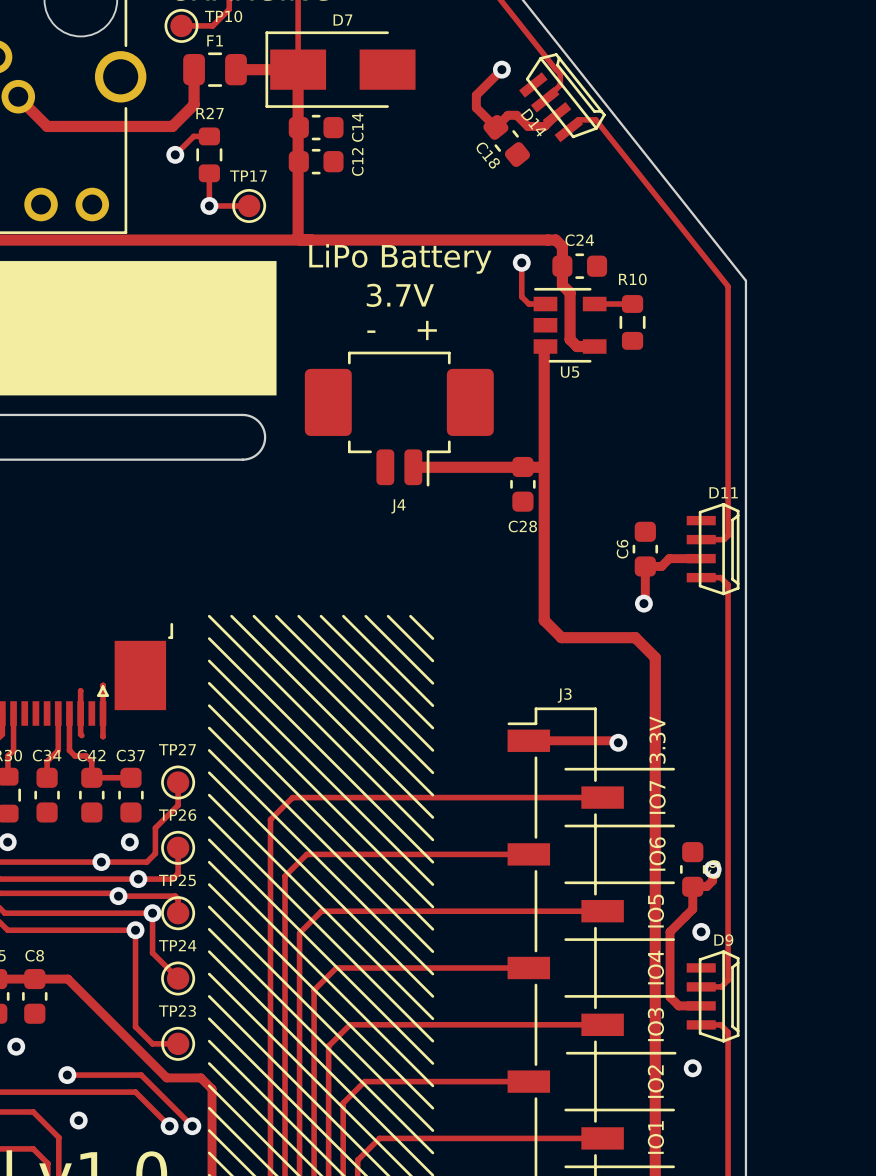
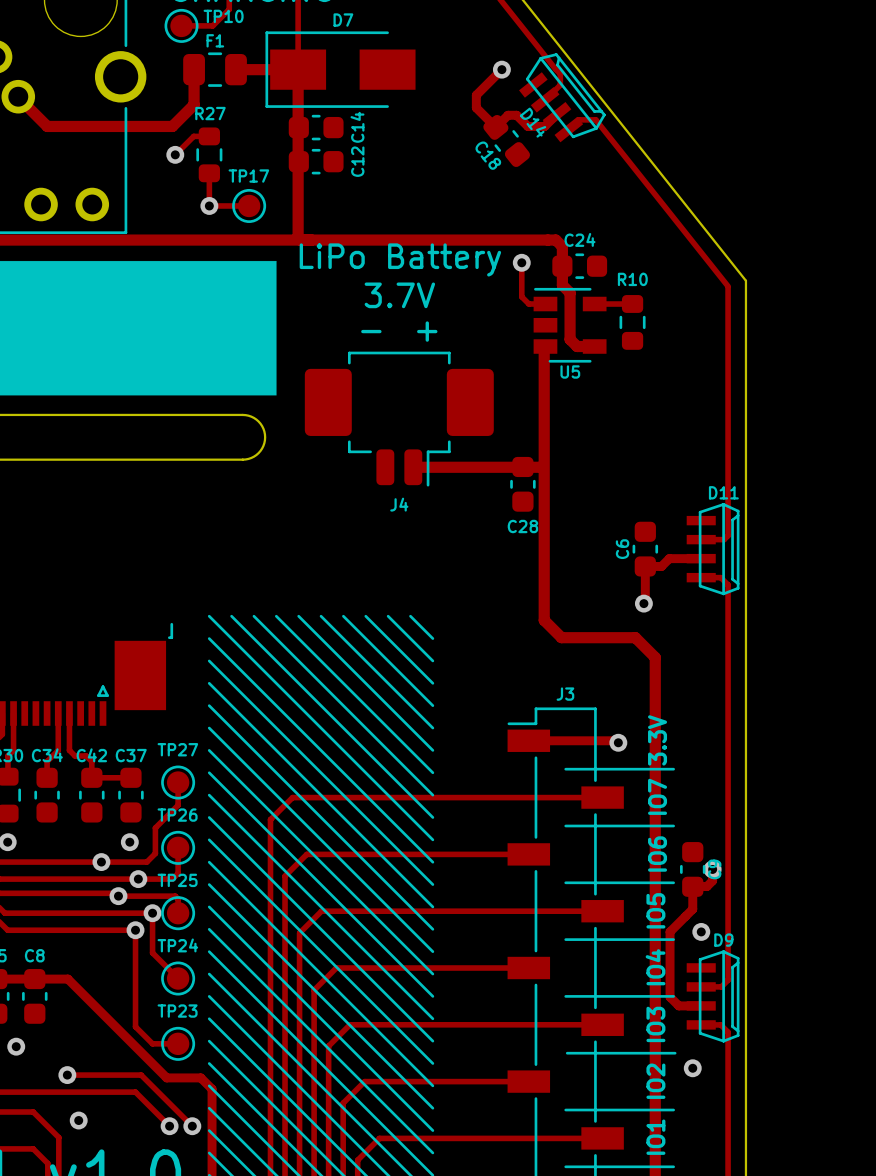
track: (103, 685) (103, 736) -> none
track: (80, 691) (81, 735) -> none

